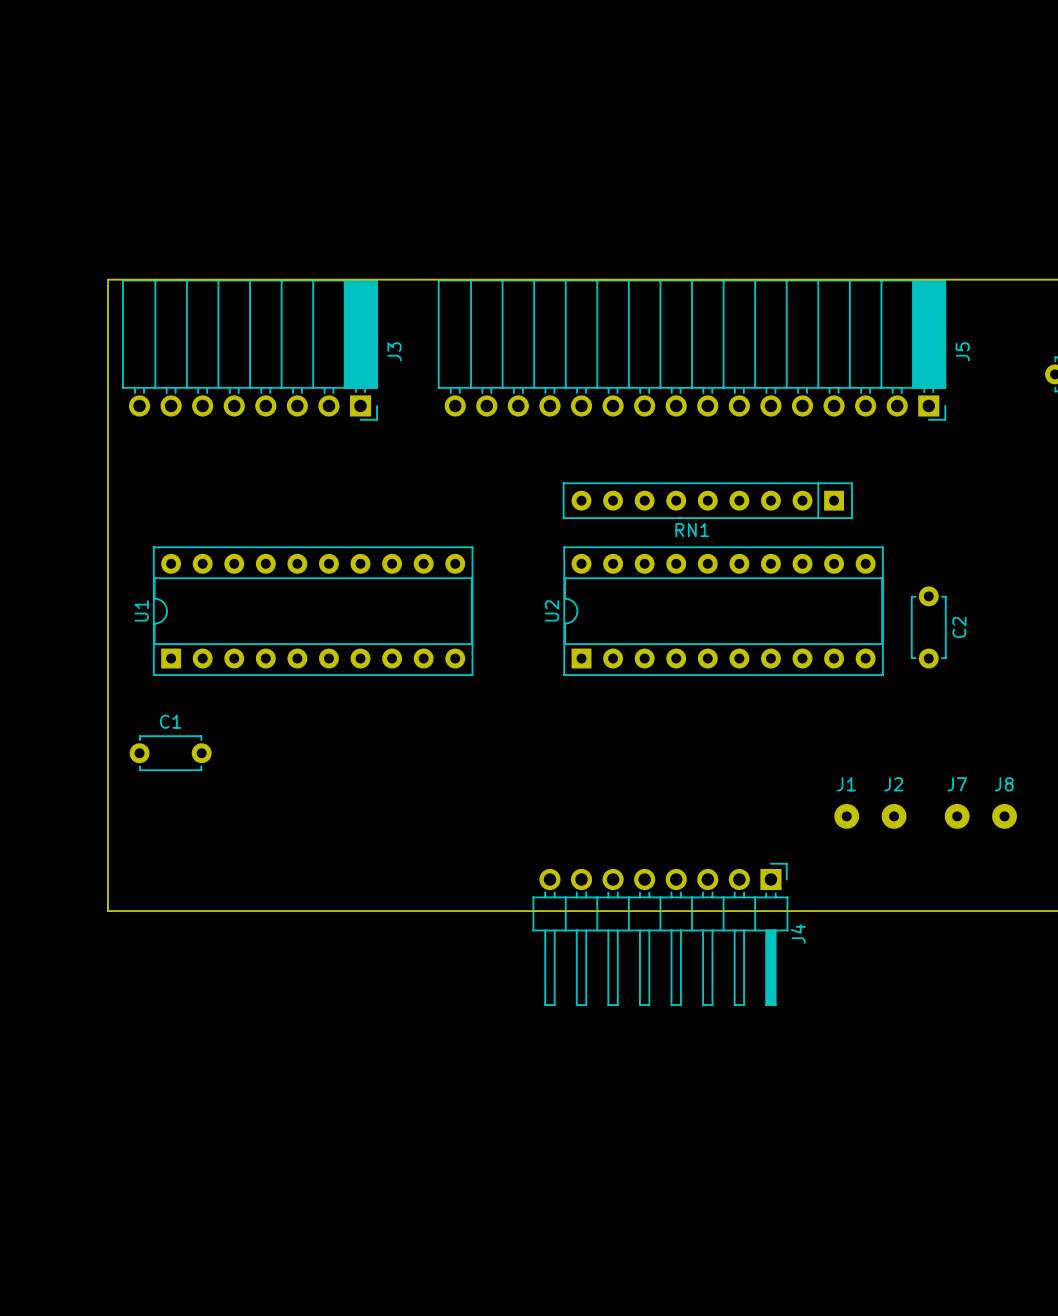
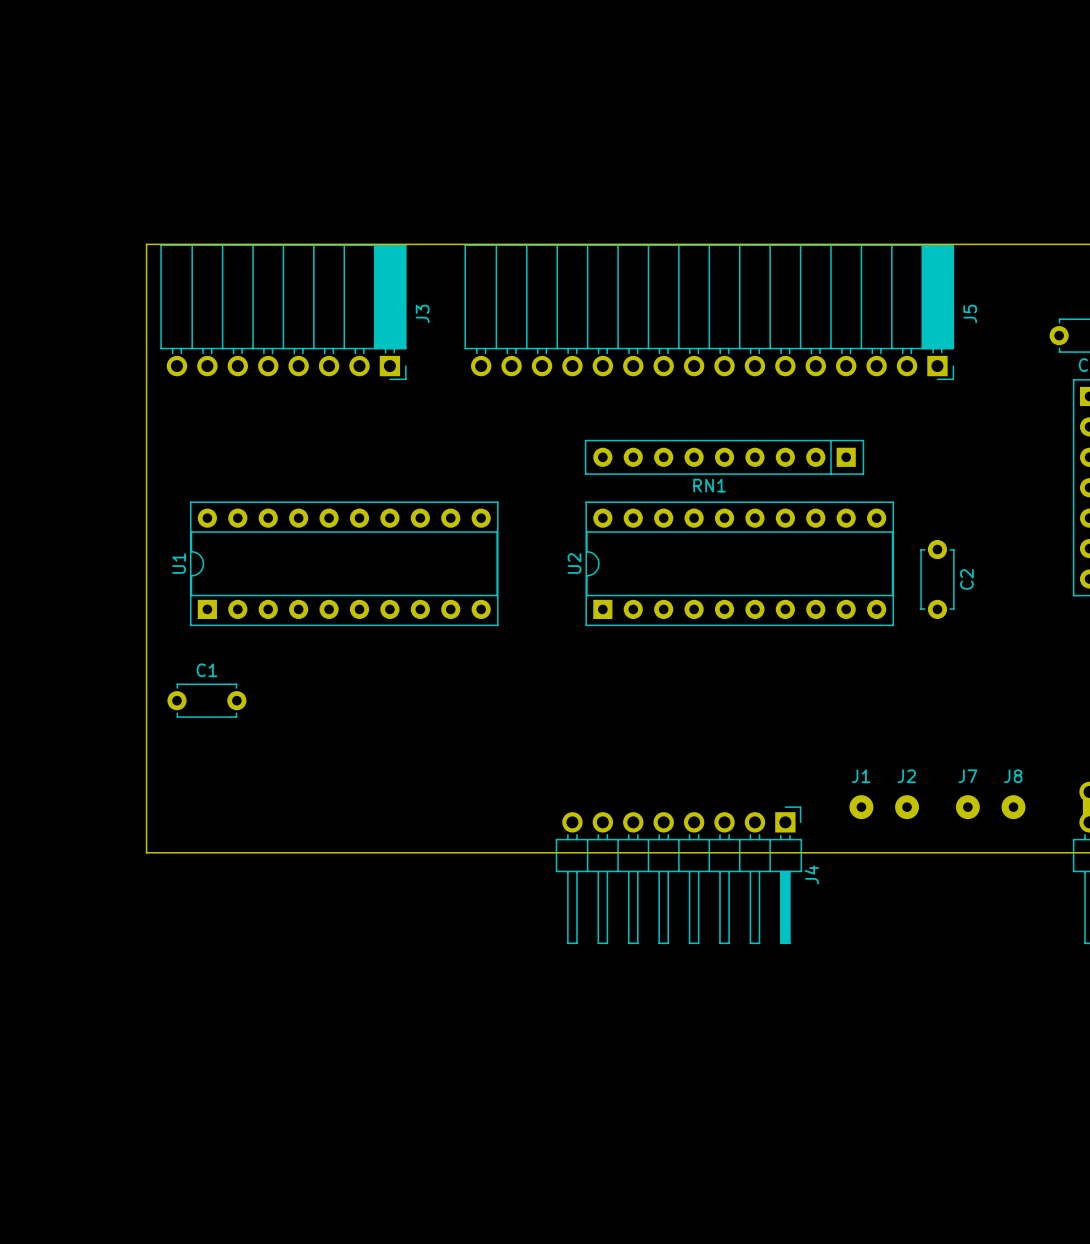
J1 position: (846, 816) -> (861, 807)
J2 position: (894, 816) -> (907, 807)
J7 position: (957, 816) -> (967, 807)
J8 position: (1004, 816) -> (1013, 807)

